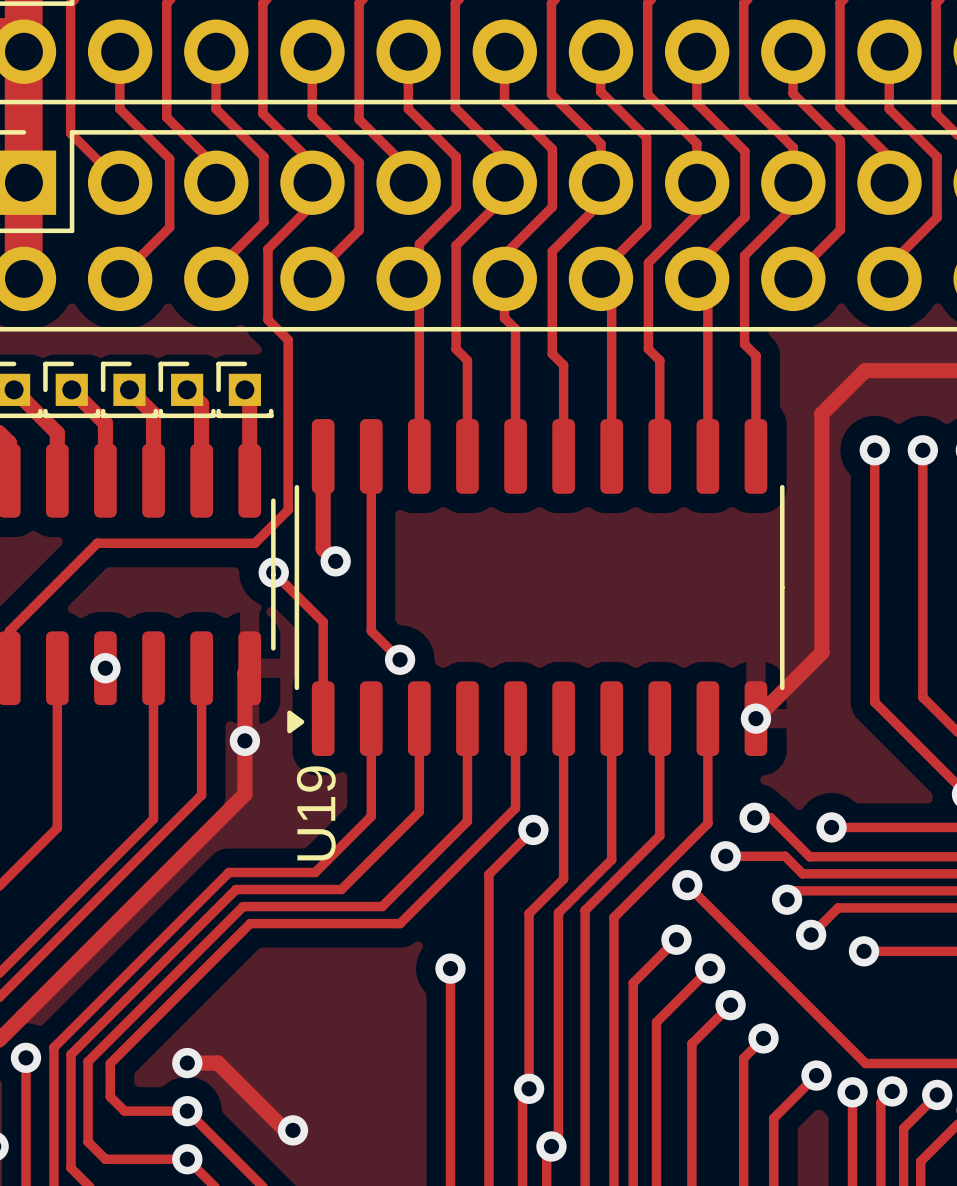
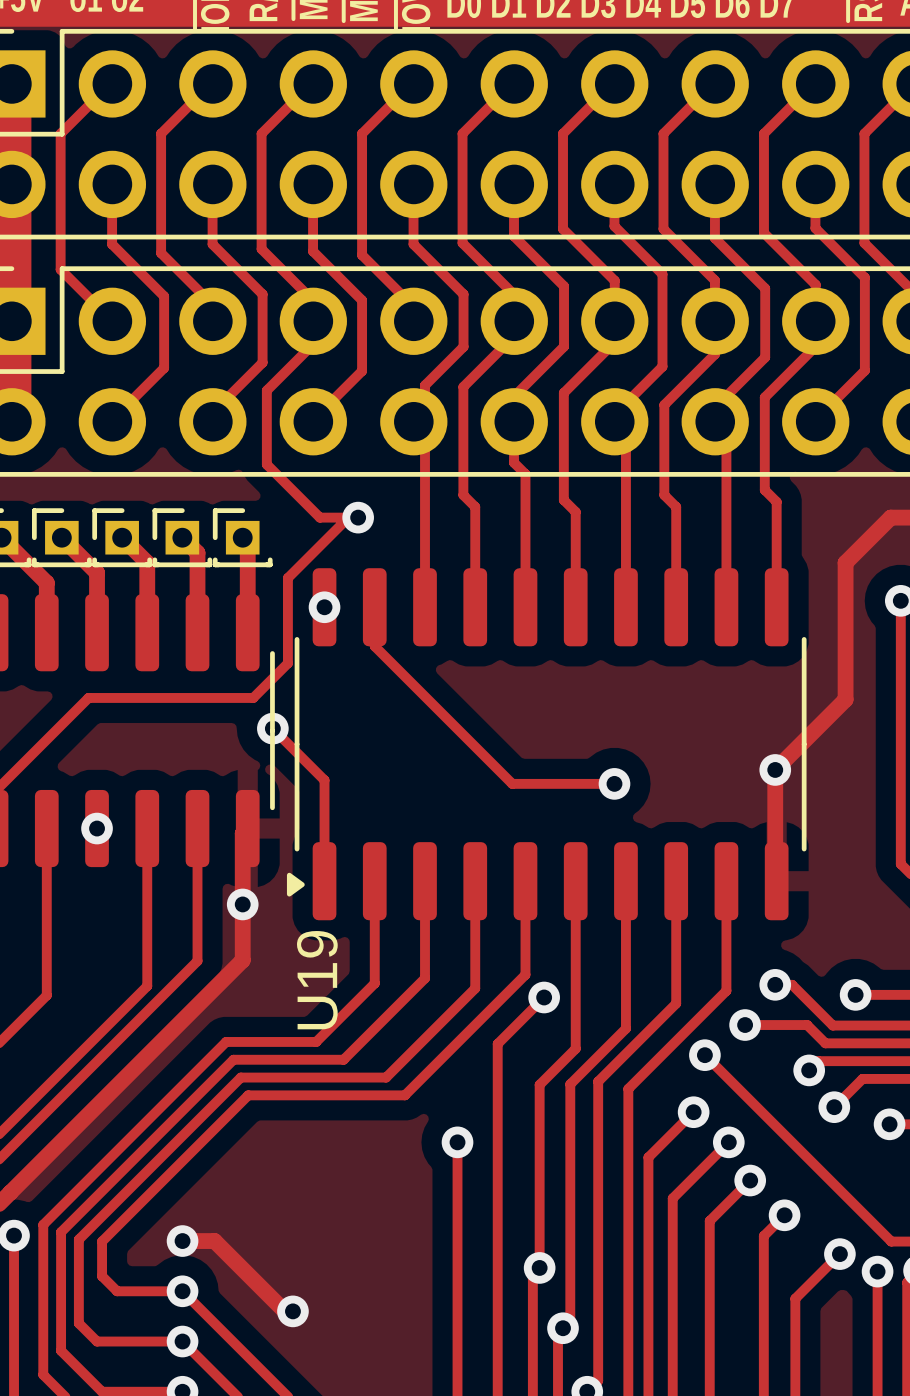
track: (288, 340) (288, 428) -> (348, 517) (287, 578)
track: none -> (287, 485) (319, 517) (358, 517)
via: none -> (358, 517)
track: (323, 456) (323, 548) (335, 561) -> none
via: none -> (324, 607)
track: (371, 493) (371, 631) (400, 659) -> (374, 646) (512, 783) (614, 783)
track: (821, 544) (821, 652) (755, 718) -> (845, 699) (775, 769) (776, 881)
via: (335, 561) -> none
via: none -> (775, 769)
via: none -> (614, 783)
via: (400, 659) -> none
via: (755, 718) -> none

